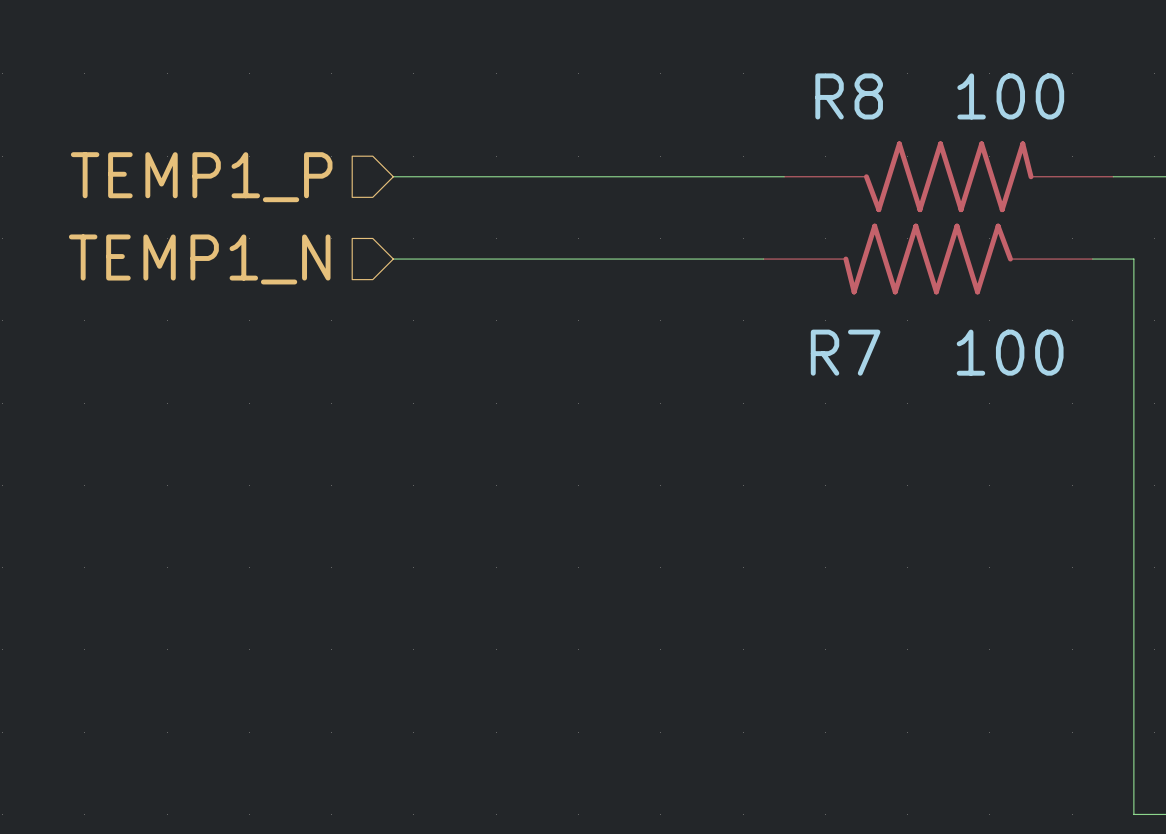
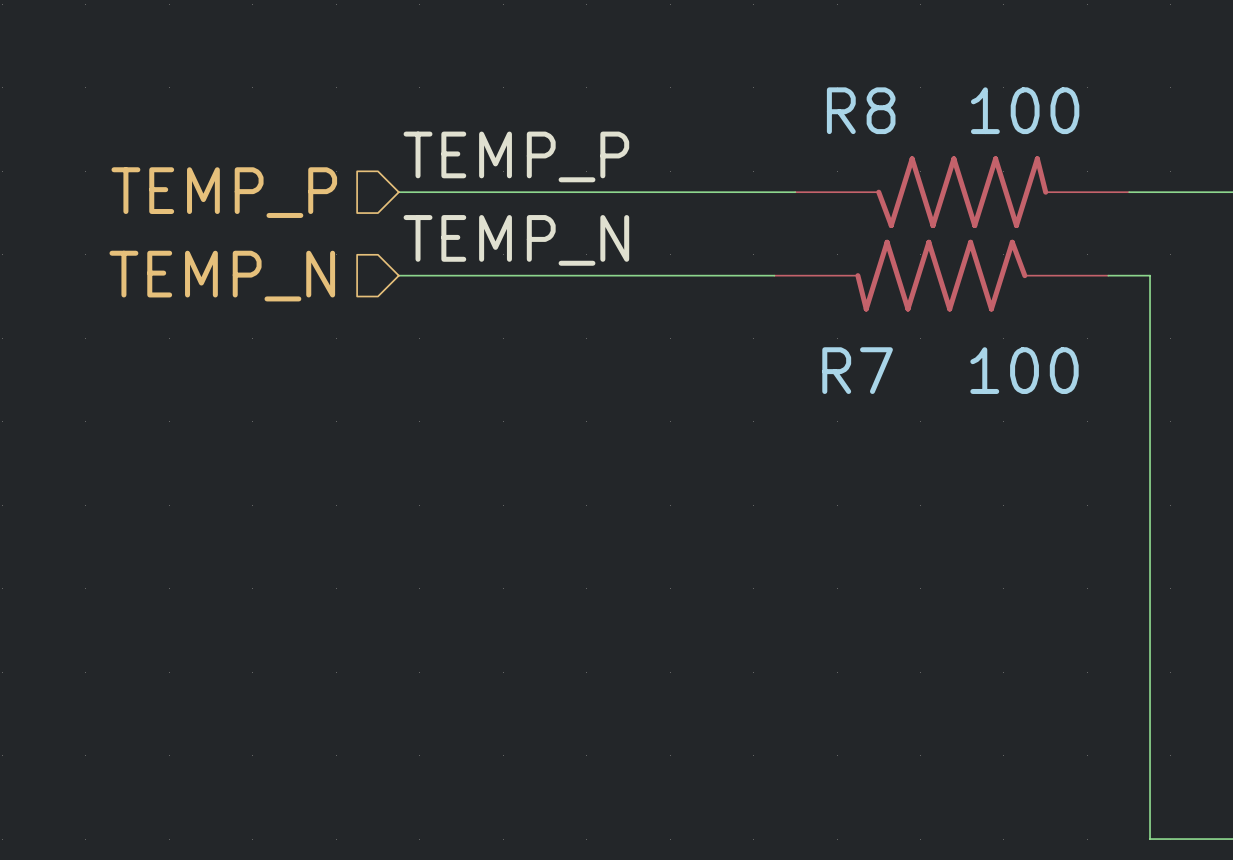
label: none -> TEMP_P (516, 156)
hierarchical label: TEMP1_P (201, 177) -> TEMP_P (224, 192)
label: none -> TEMP_N (516, 240)
hierarchical label: TEMP1_N (199, 259) -> TEMP_N (222, 276)

